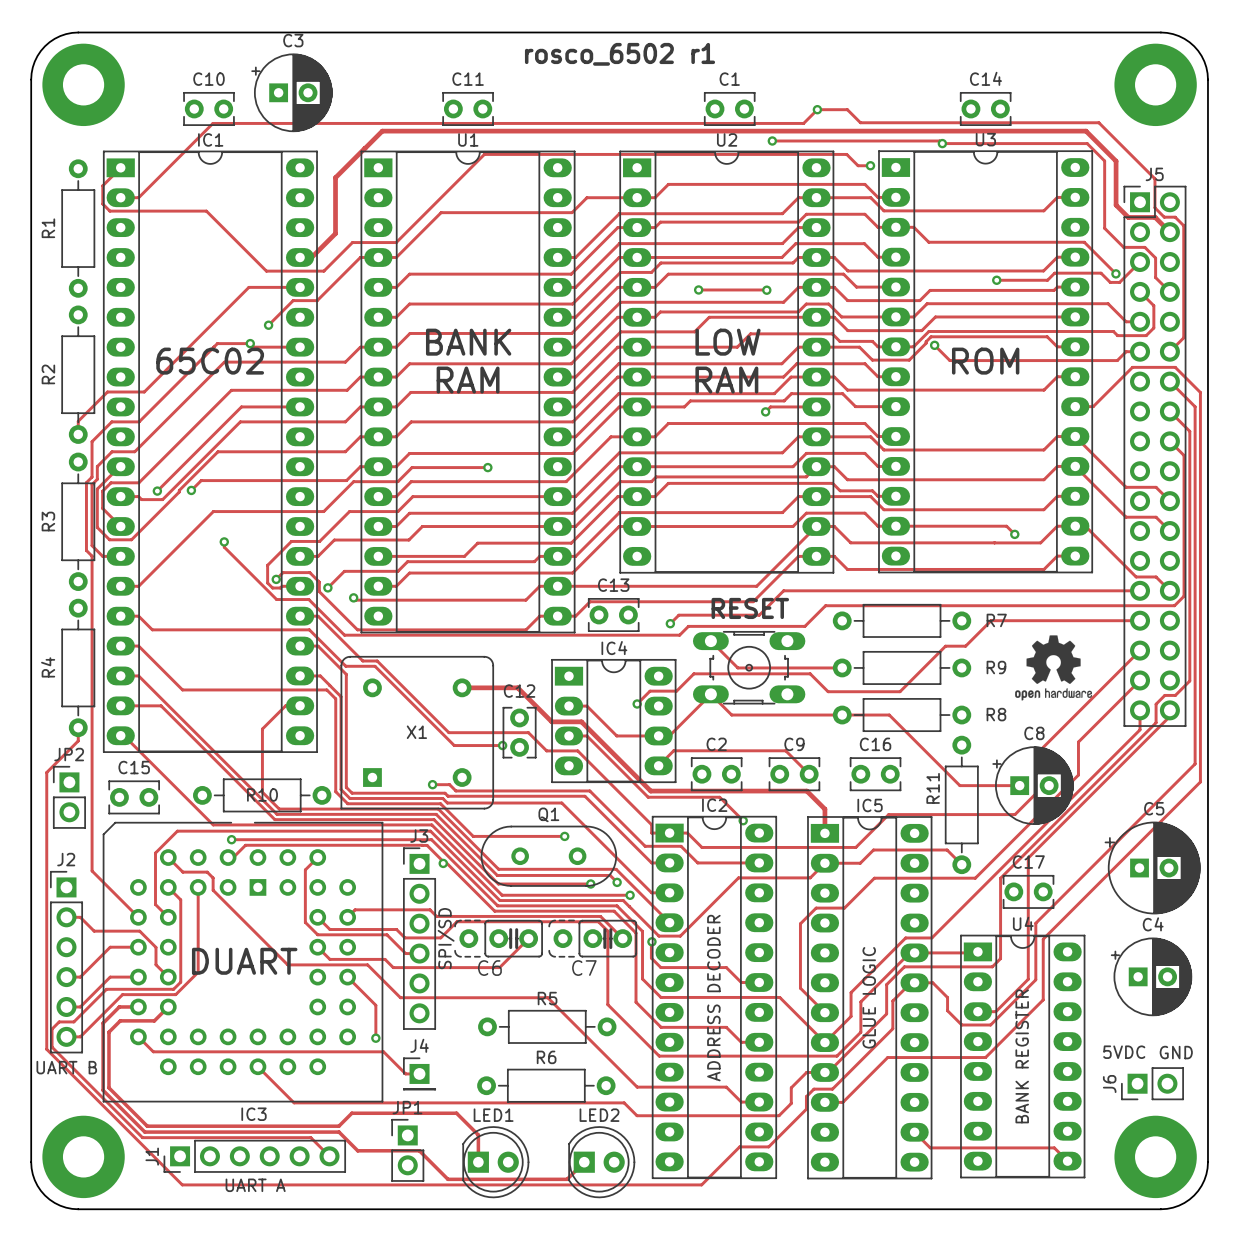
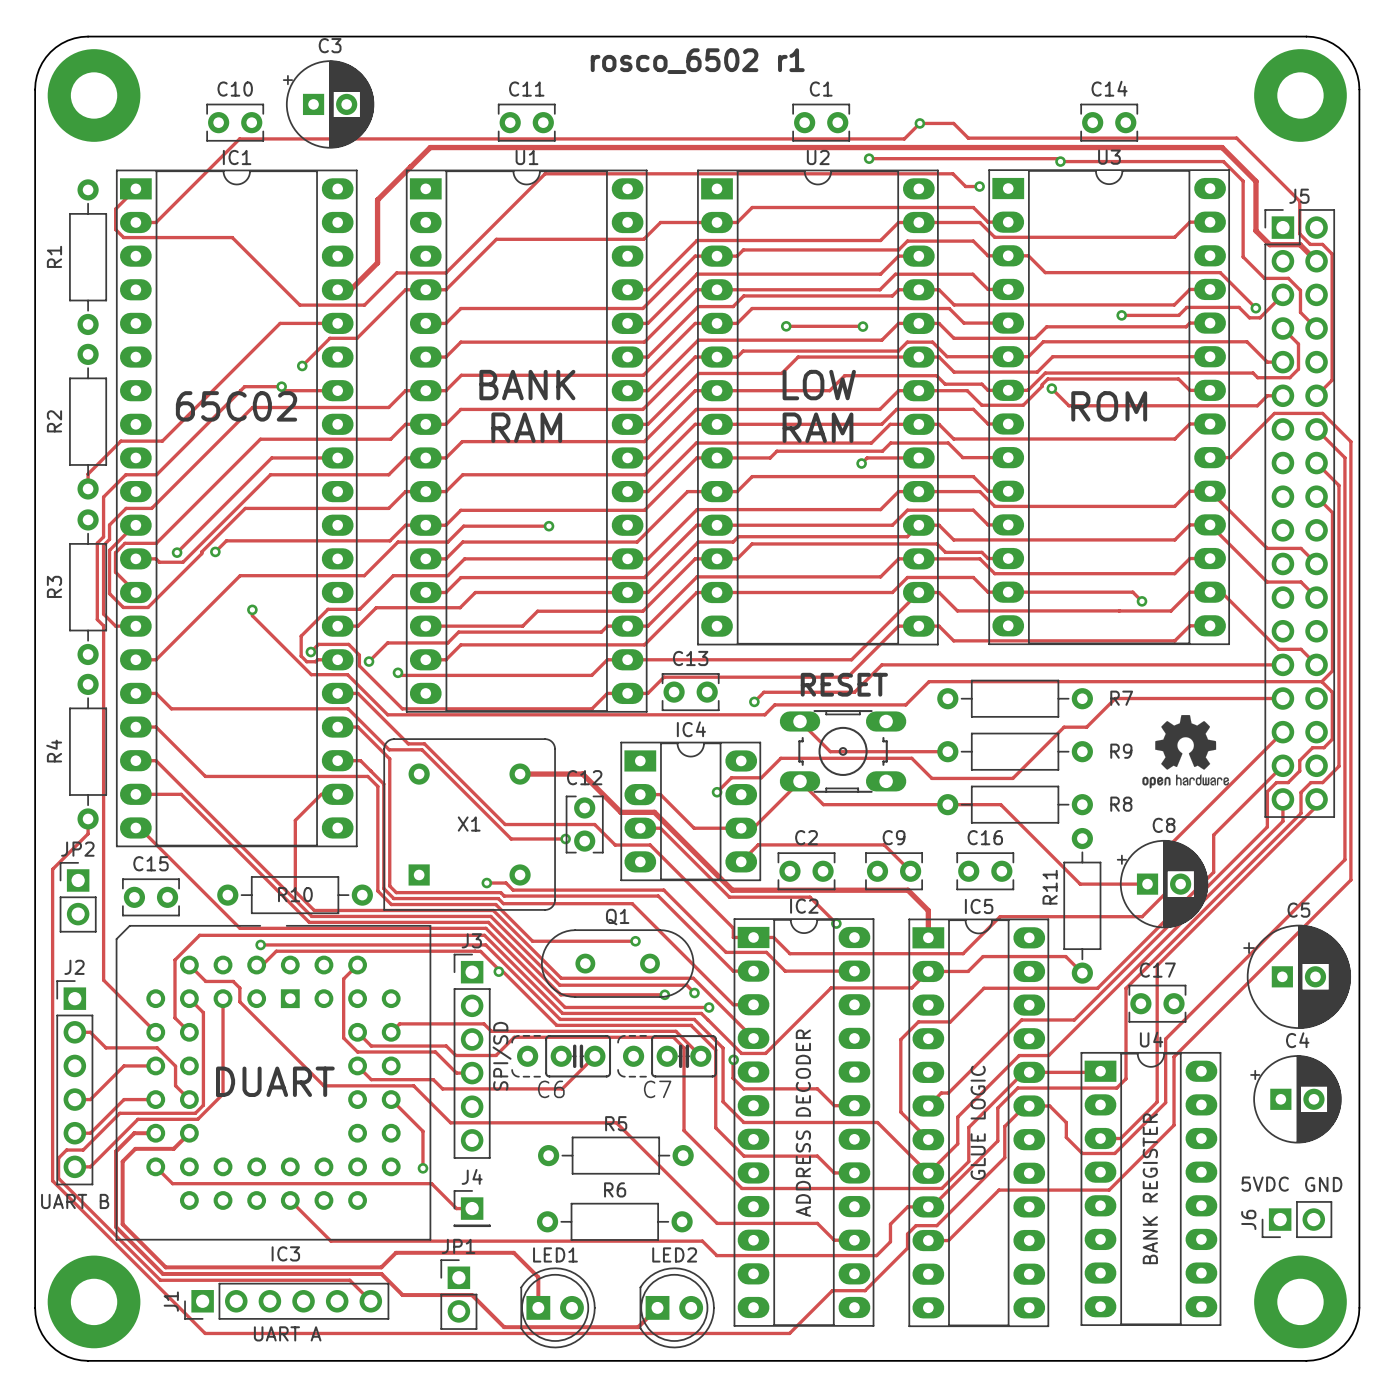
track: none -> (1321, 681) (1332, 692) (1332, 739) (1323, 747) (1312, 747) (1299, 760) (1299, 771) (1288, 782) (1276, 782) (1267, 791) (1267, 826) (1074, 1019) (1021, 1019) (948, 1093) (941, 1093) (928, 1106)
track: (914, 1132) (930, 1147) (1054, 1147) (1067, 1161) -> none

